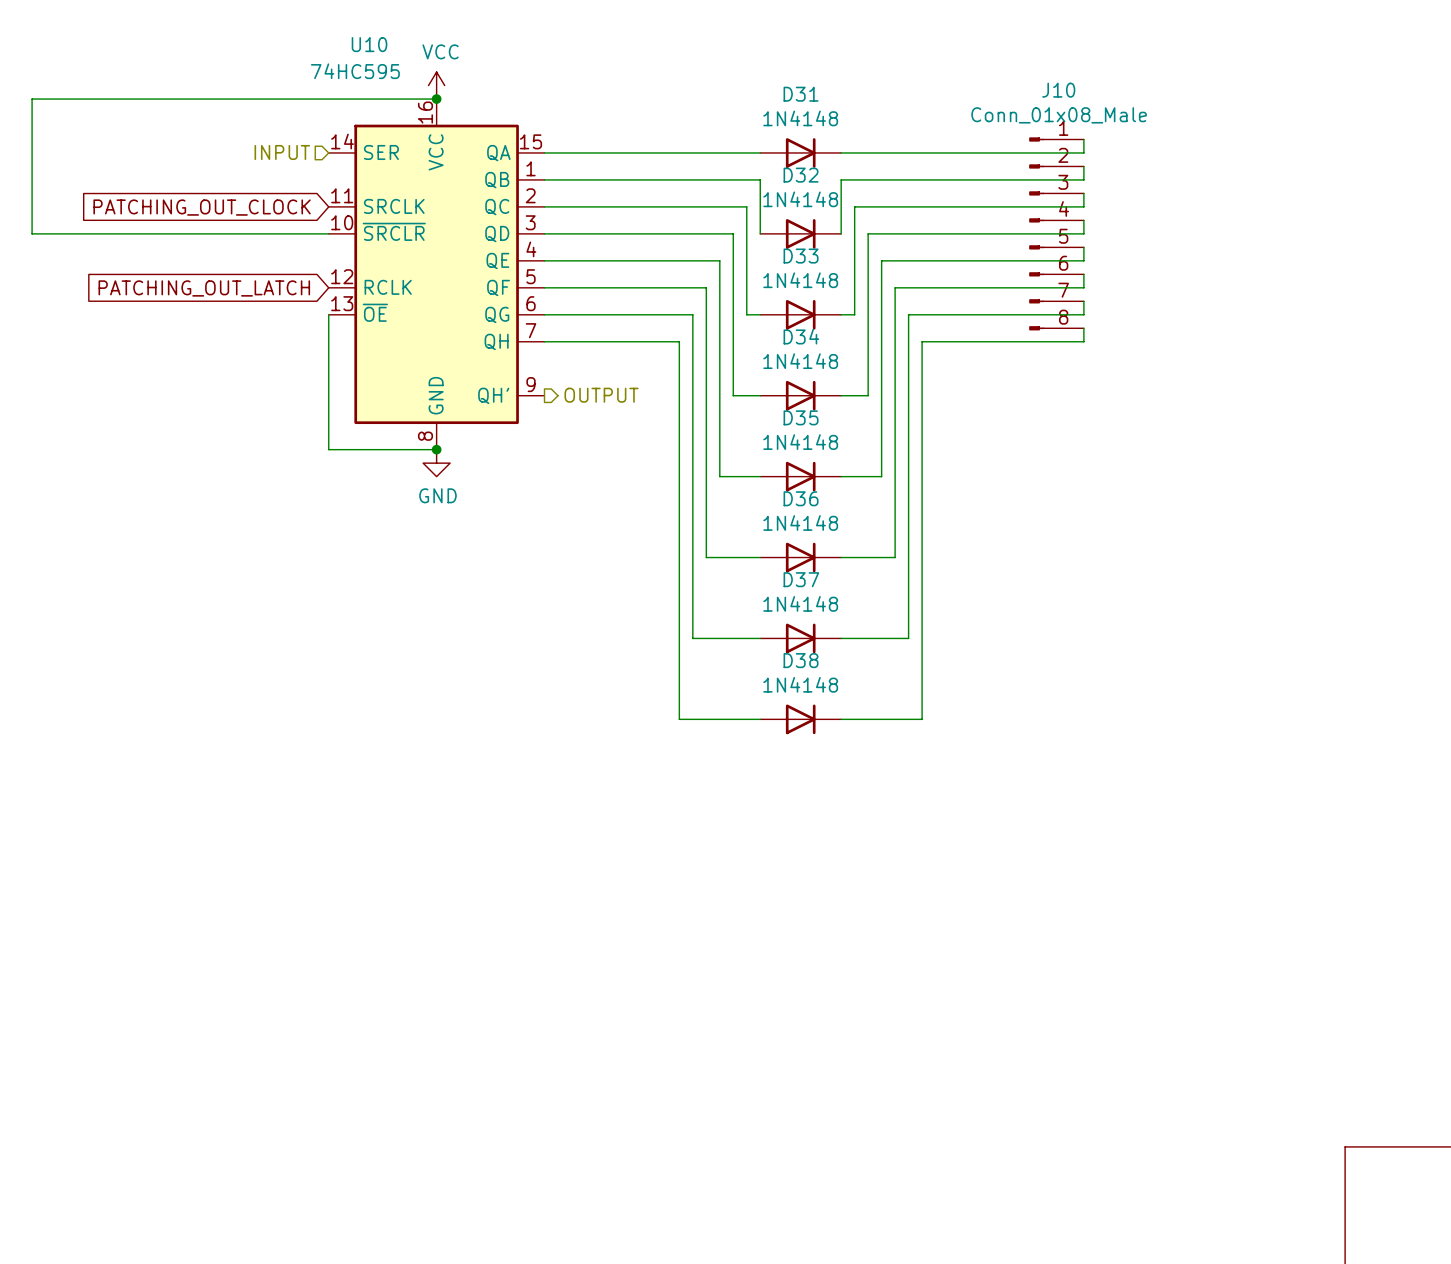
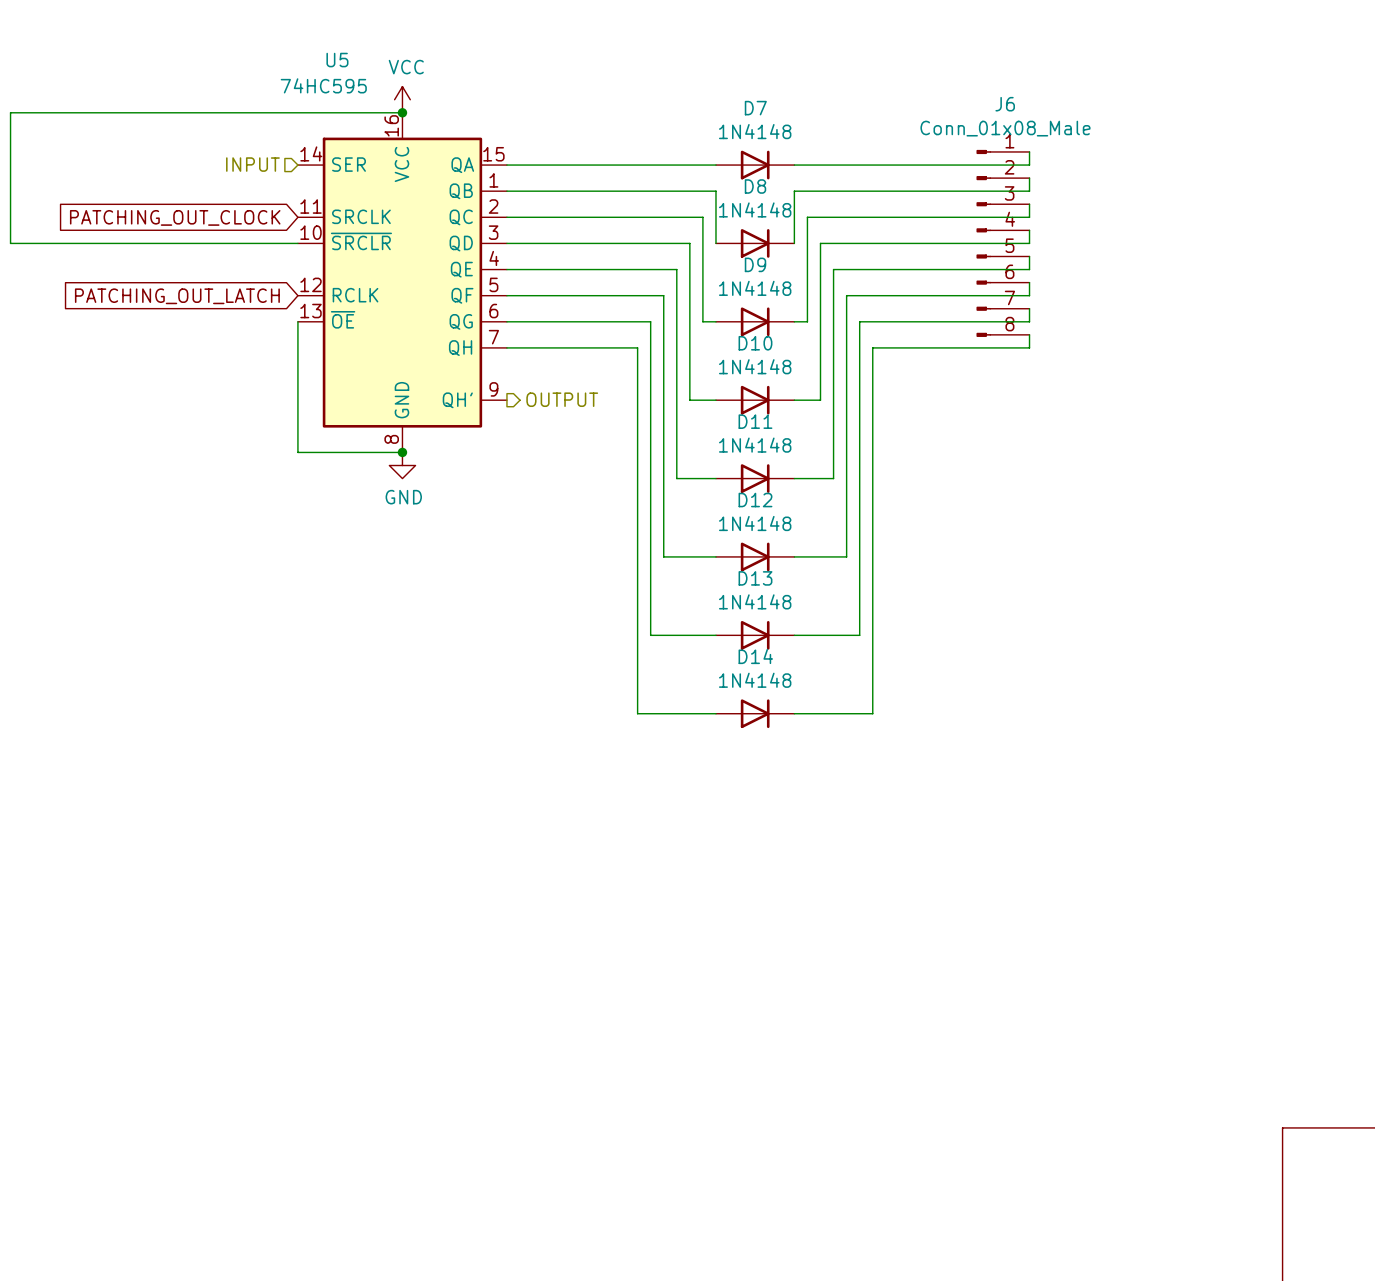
U10 name: U10 (369, 44) -> U5 (337, 60)
J10 name: J10 (1058, 90) -> J6 (1005, 104)
D31 name: D31 (801, 94) -> D7 (755, 108)
D32 name: D32 (801, 175) -> D8 (755, 186)
D33 name: D33 (801, 256) -> D9 (755, 264)
D34 name: D34 (801, 336) -> D10 (755, 343)
D35 name: D35 (801, 417) -> D11 (755, 421)
D36 name: D36 (801, 498) -> D12 (755, 500)
D37 name: D37 (801, 579) -> D13 (755, 578)
D38 name: D38 (801, 660) -> D14 (755, 656)

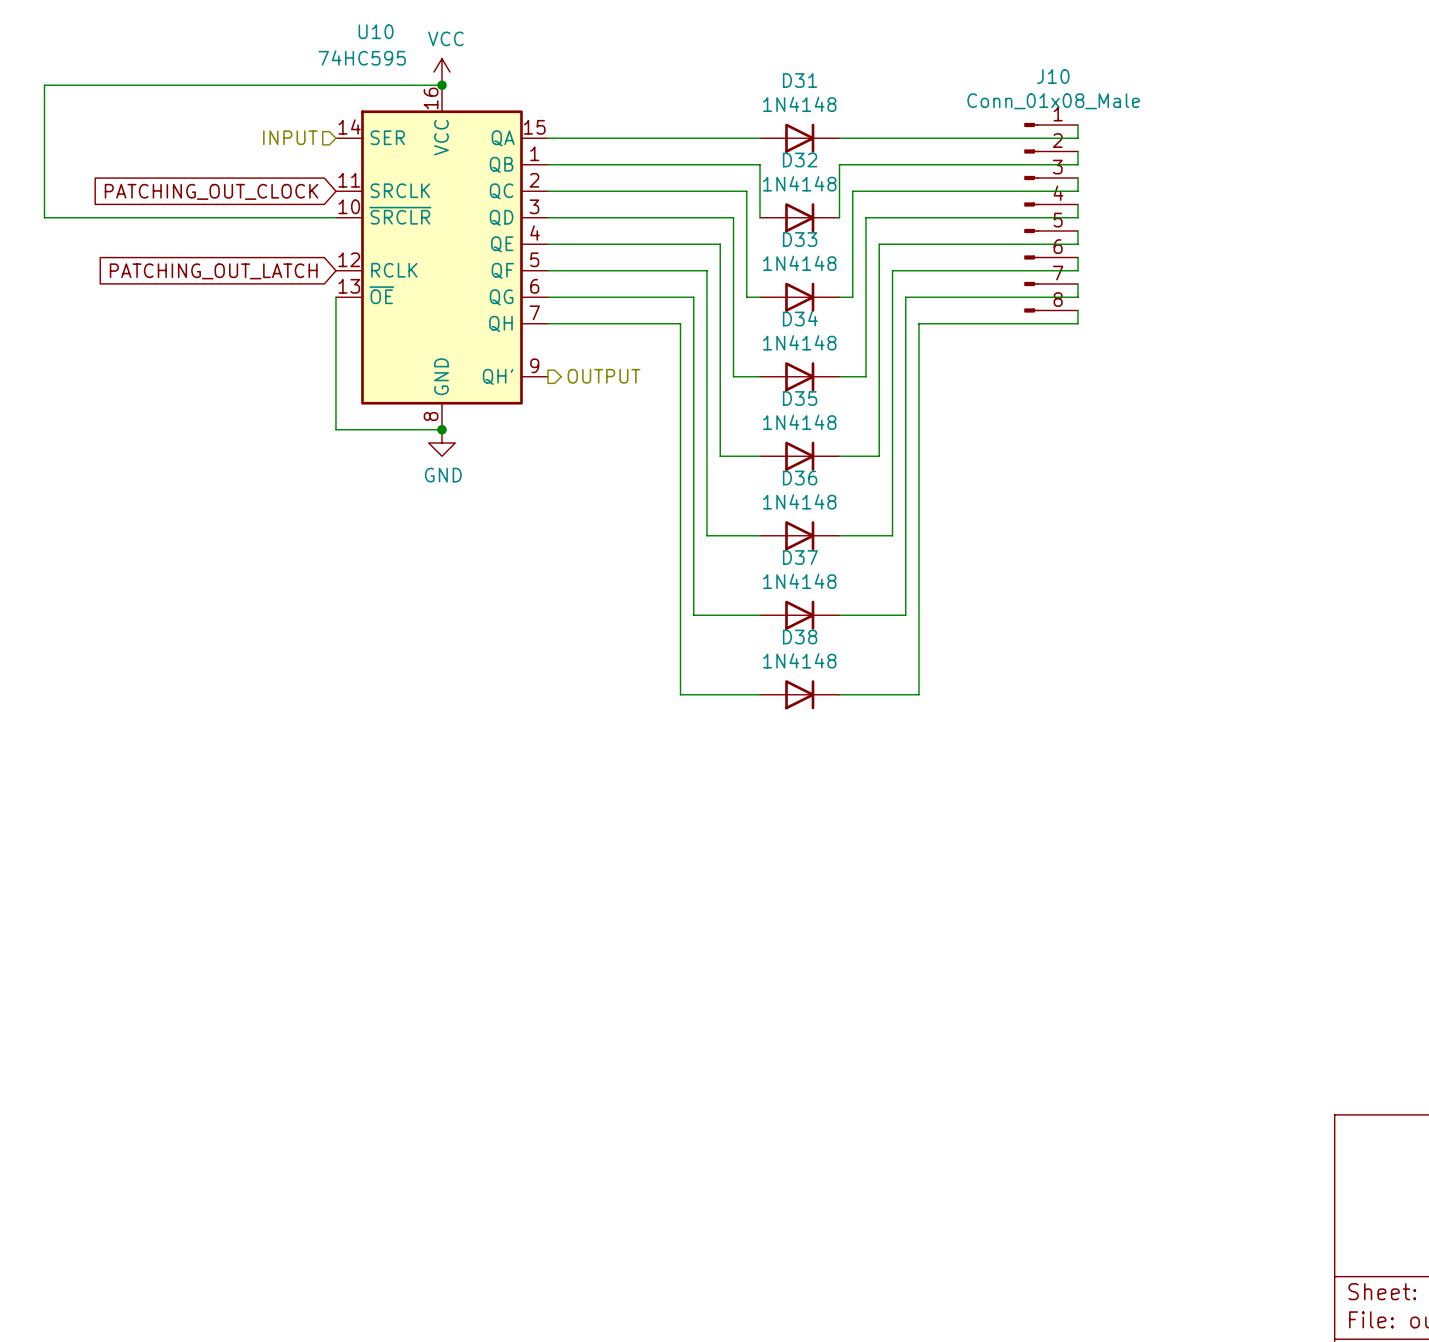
U5 name: U5 (337, 60) -> U10 (376, 31)
J6 name: J6 (1005, 104) -> J10 (1053, 76)
D7 name: D7 (755, 108) -> D31 (800, 80)
D8 name: D8 (755, 186) -> D32 (800, 160)
D9 name: D9 (755, 264) -> D33 (800, 239)
D10 name: D10 (755, 343) -> D34 (800, 318)
D11 name: D11 (755, 421) -> D35 (800, 398)
D12 name: D12 (755, 500) -> D36 (800, 478)
D13 name: D13 (755, 578) -> D37 (800, 557)
D14 name: D14 (755, 656) -> D38 (800, 637)

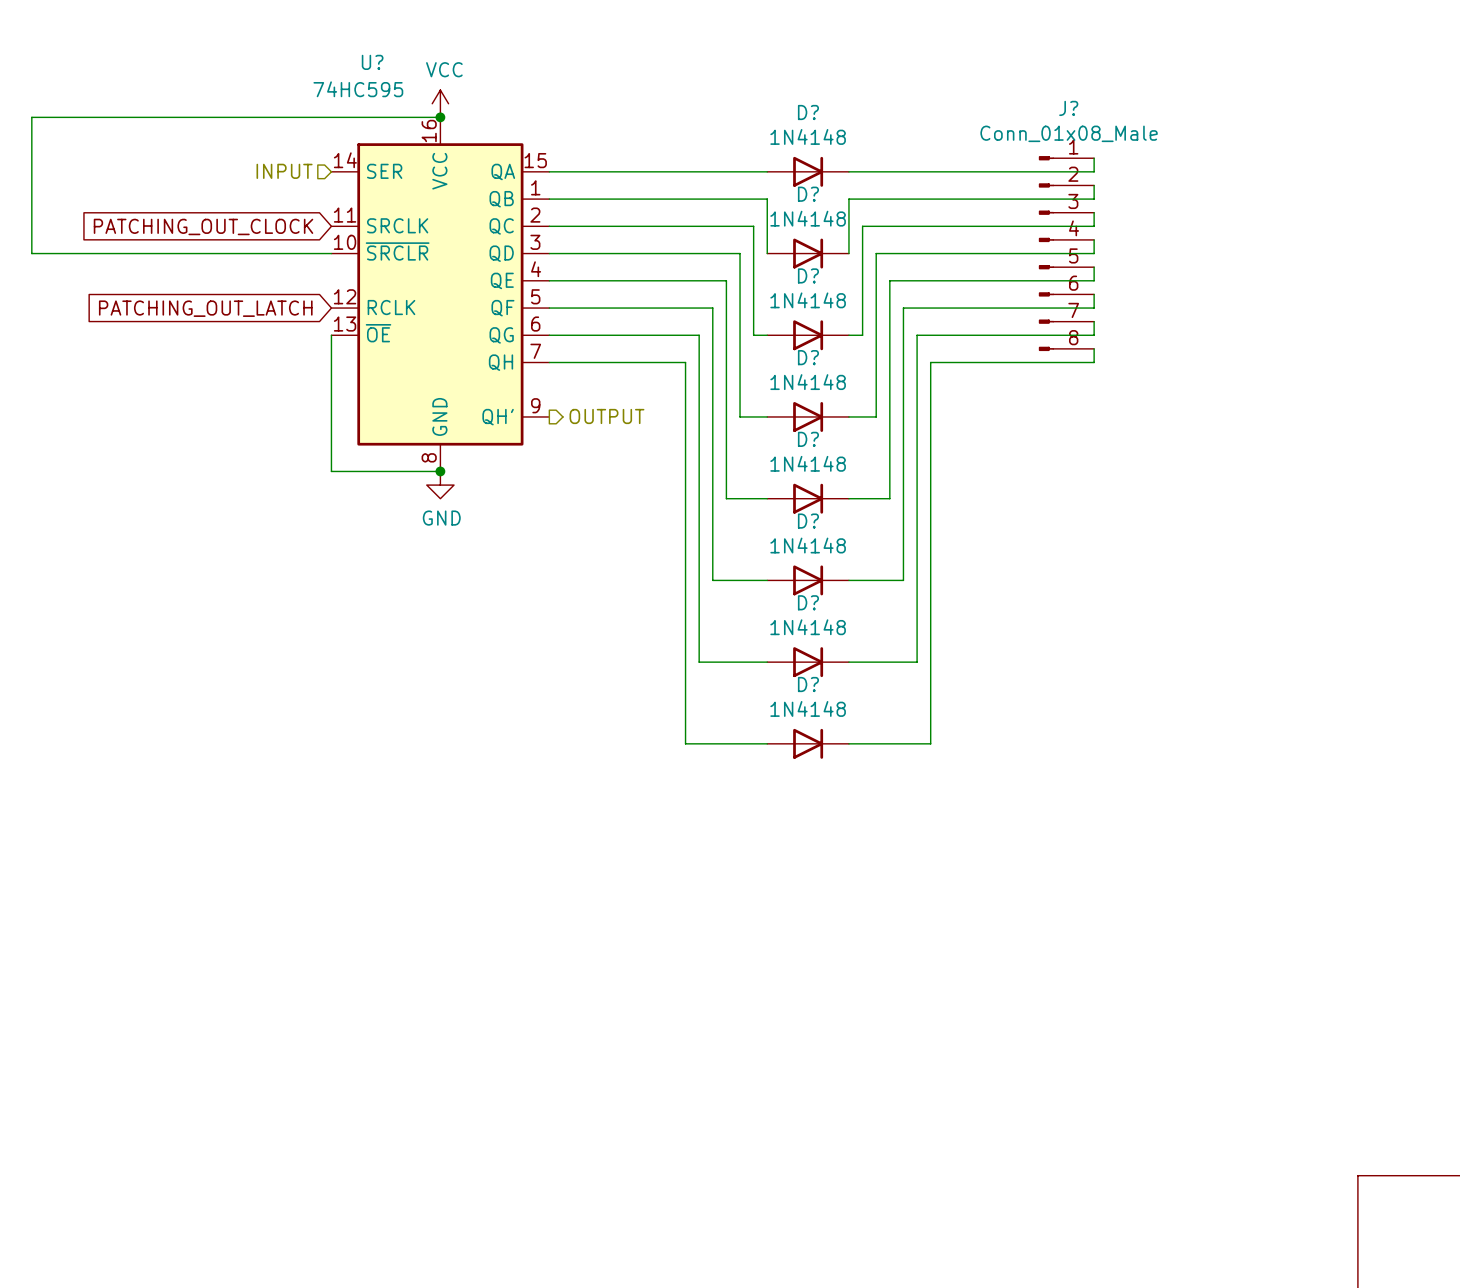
U10 name: U10 (376, 31) -> U? (372, 62)
J10 name: J10 (1053, 76) -> J? (1068, 108)
D31 name: D31 (800, 80) -> D? (808, 112)
D32 name: D32 (800, 160) -> D? (808, 194)
D33 name: D33 (800, 239) -> D? (808, 275)
D34 name: D34 (800, 318) -> D? (808, 357)
D35 name: D35 (800, 398) -> D? (808, 439)
D36 name: D36 (800, 478) -> D? (808, 521)
D37 name: D37 (800, 557) -> D? (808, 602)
D38 name: D38 (800, 637) -> D? (808, 684)

